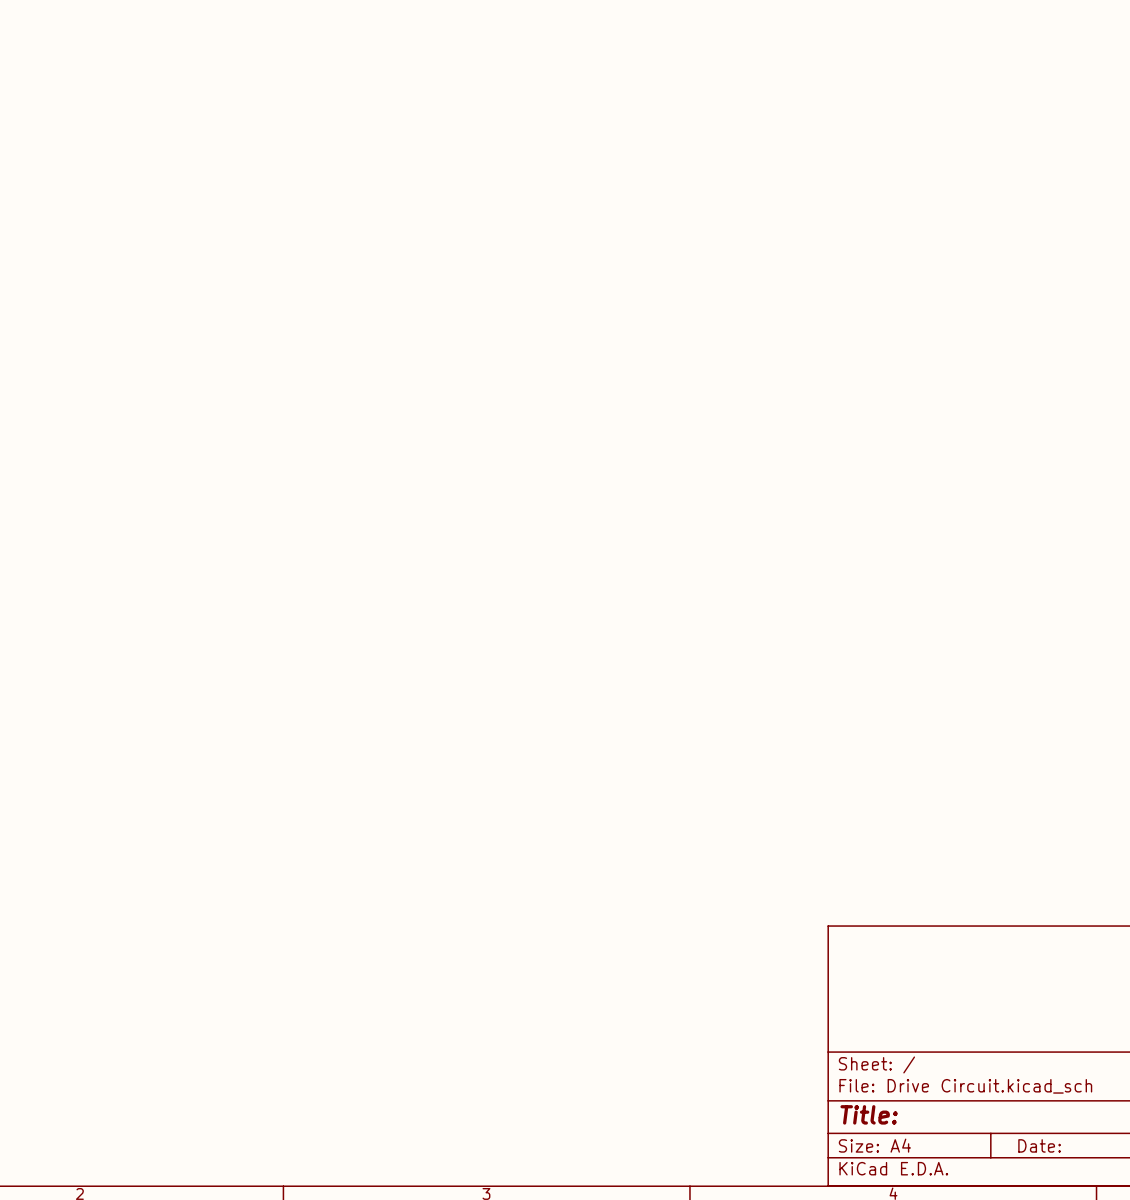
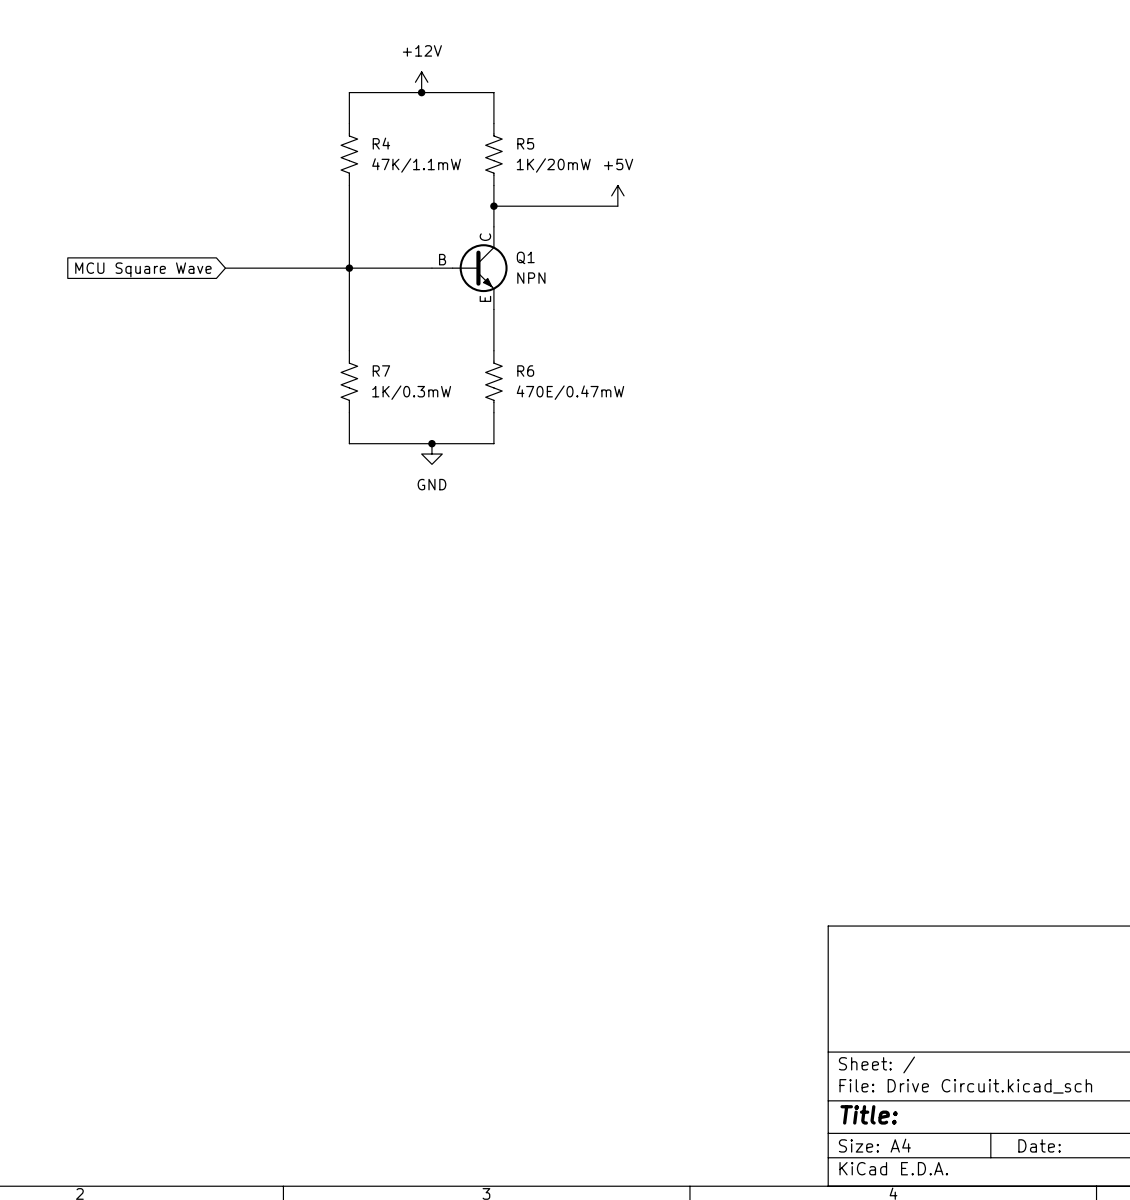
power symbol: none -> +12V (421, 82)
junction: none -> (421, 92)
wire: none -> (349, 123) (349, 92) (493, 92) (493, 123)
R4: none -> 47K/1.1mW (349, 154)
R5: none -> 1K/20mW (493, 154)
wire: none -> (349, 185) (349, 350)
wire: none -> (493, 185) (493, 226)
power symbol: none -> +5V (617, 195)
wire: none -> (493, 206) (617, 206)
junction: none -> (493, 206)
wire: none -> (225, 268) (431, 268)
junction: none -> (349, 268)
Q1: none -> NPN (469, 268)
global label: none -> MCU Square Wave (143, 269)
wire: none -> (493, 309) (493, 350)
R7: none -> 1K/0.3mW (349, 381)
R6: none -> 470E/0.47mW (493, 381)
wire: none -> (349, 412) (349, 443) (493, 443) (493, 412)
junction: none -> (431, 443)
power symbol: none -> GND (431, 454)

